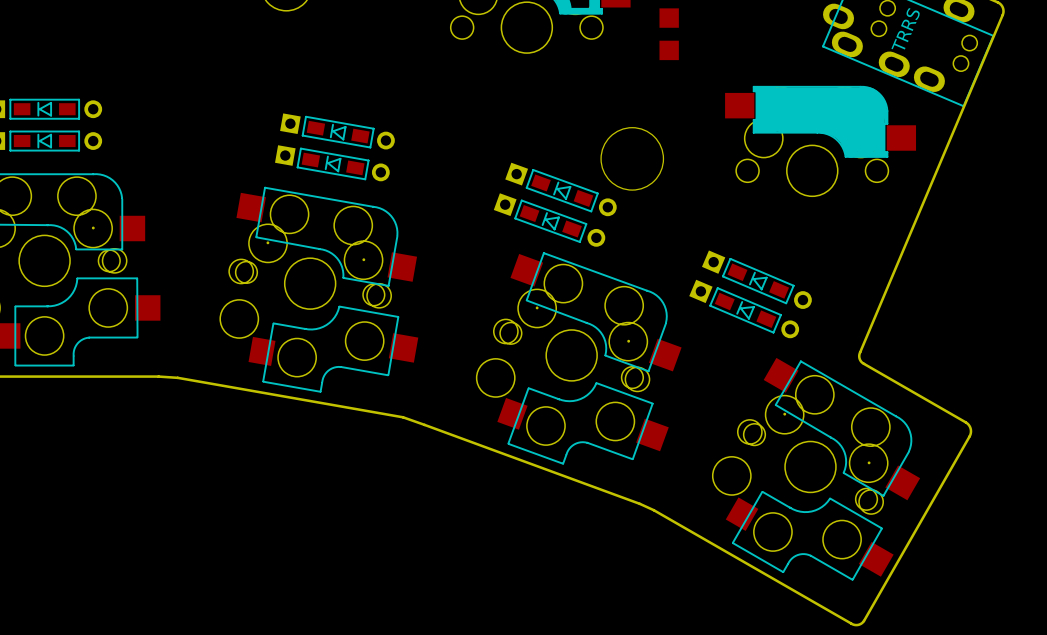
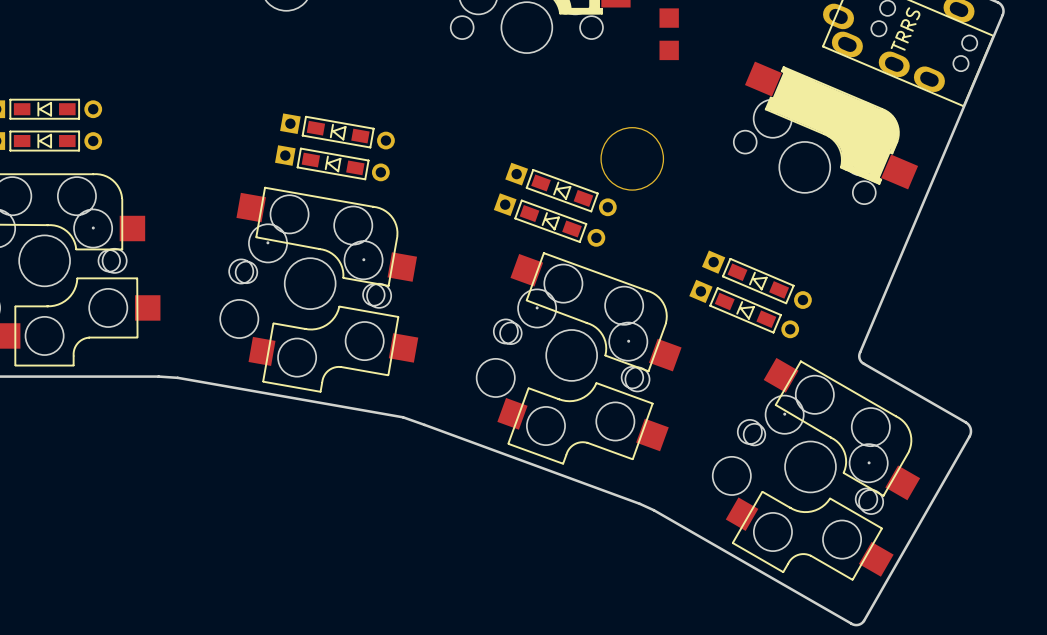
part rotation: 0° (820, 141) -> 23° clockwise (825, 132)

